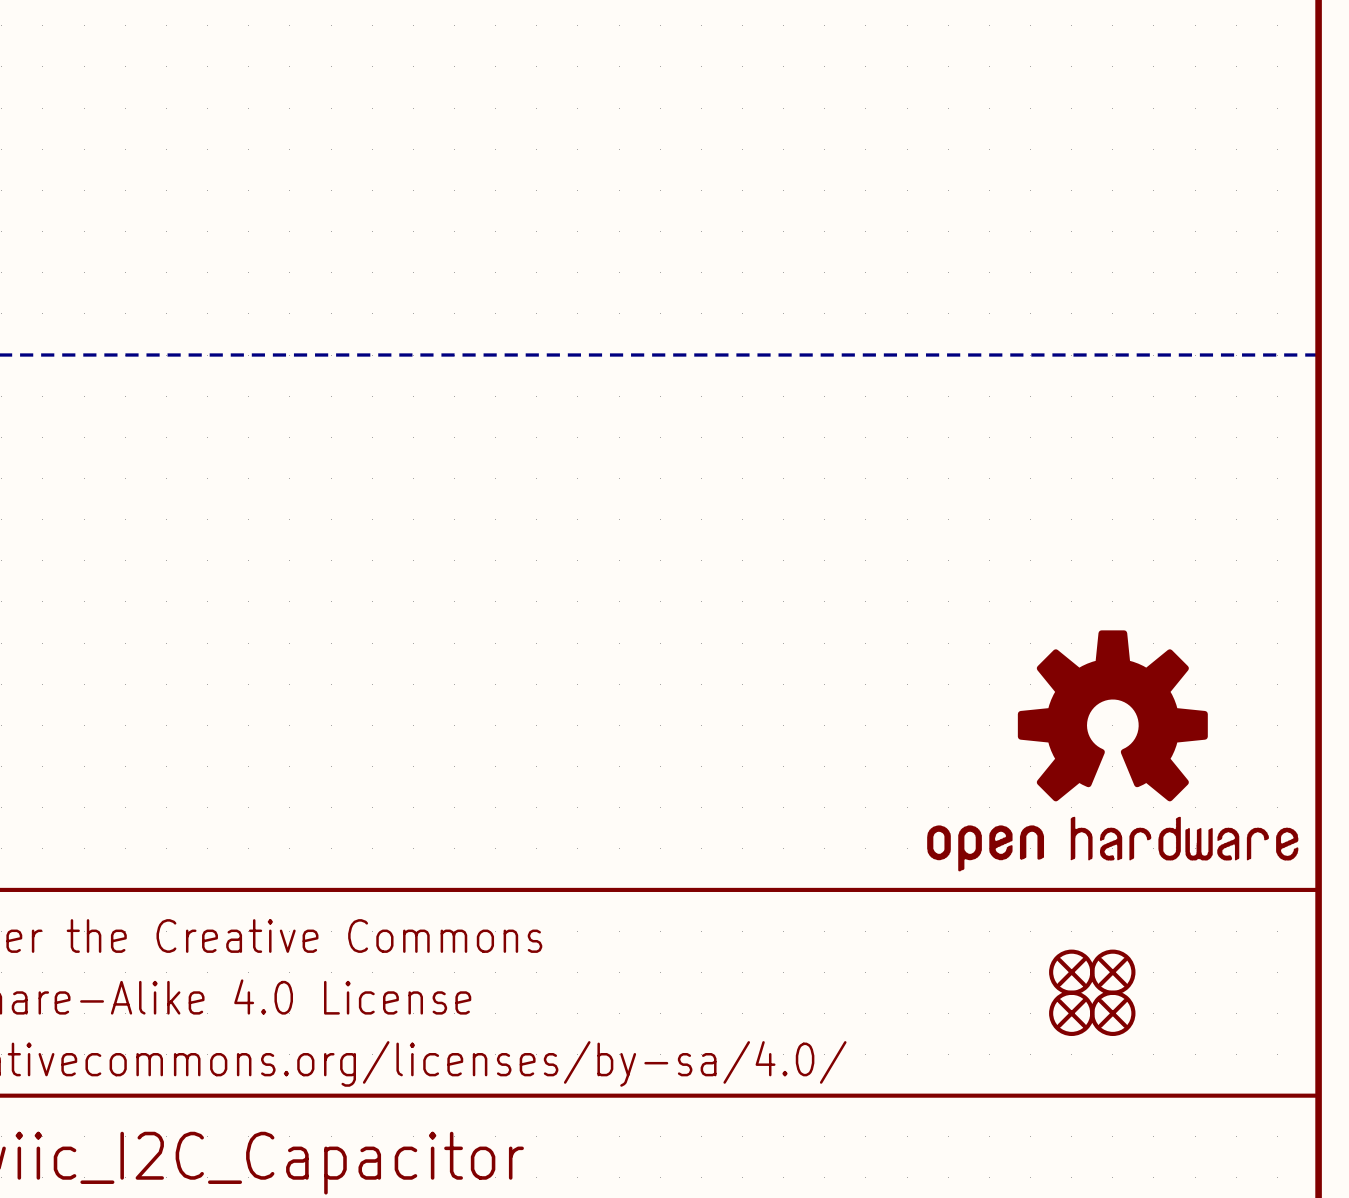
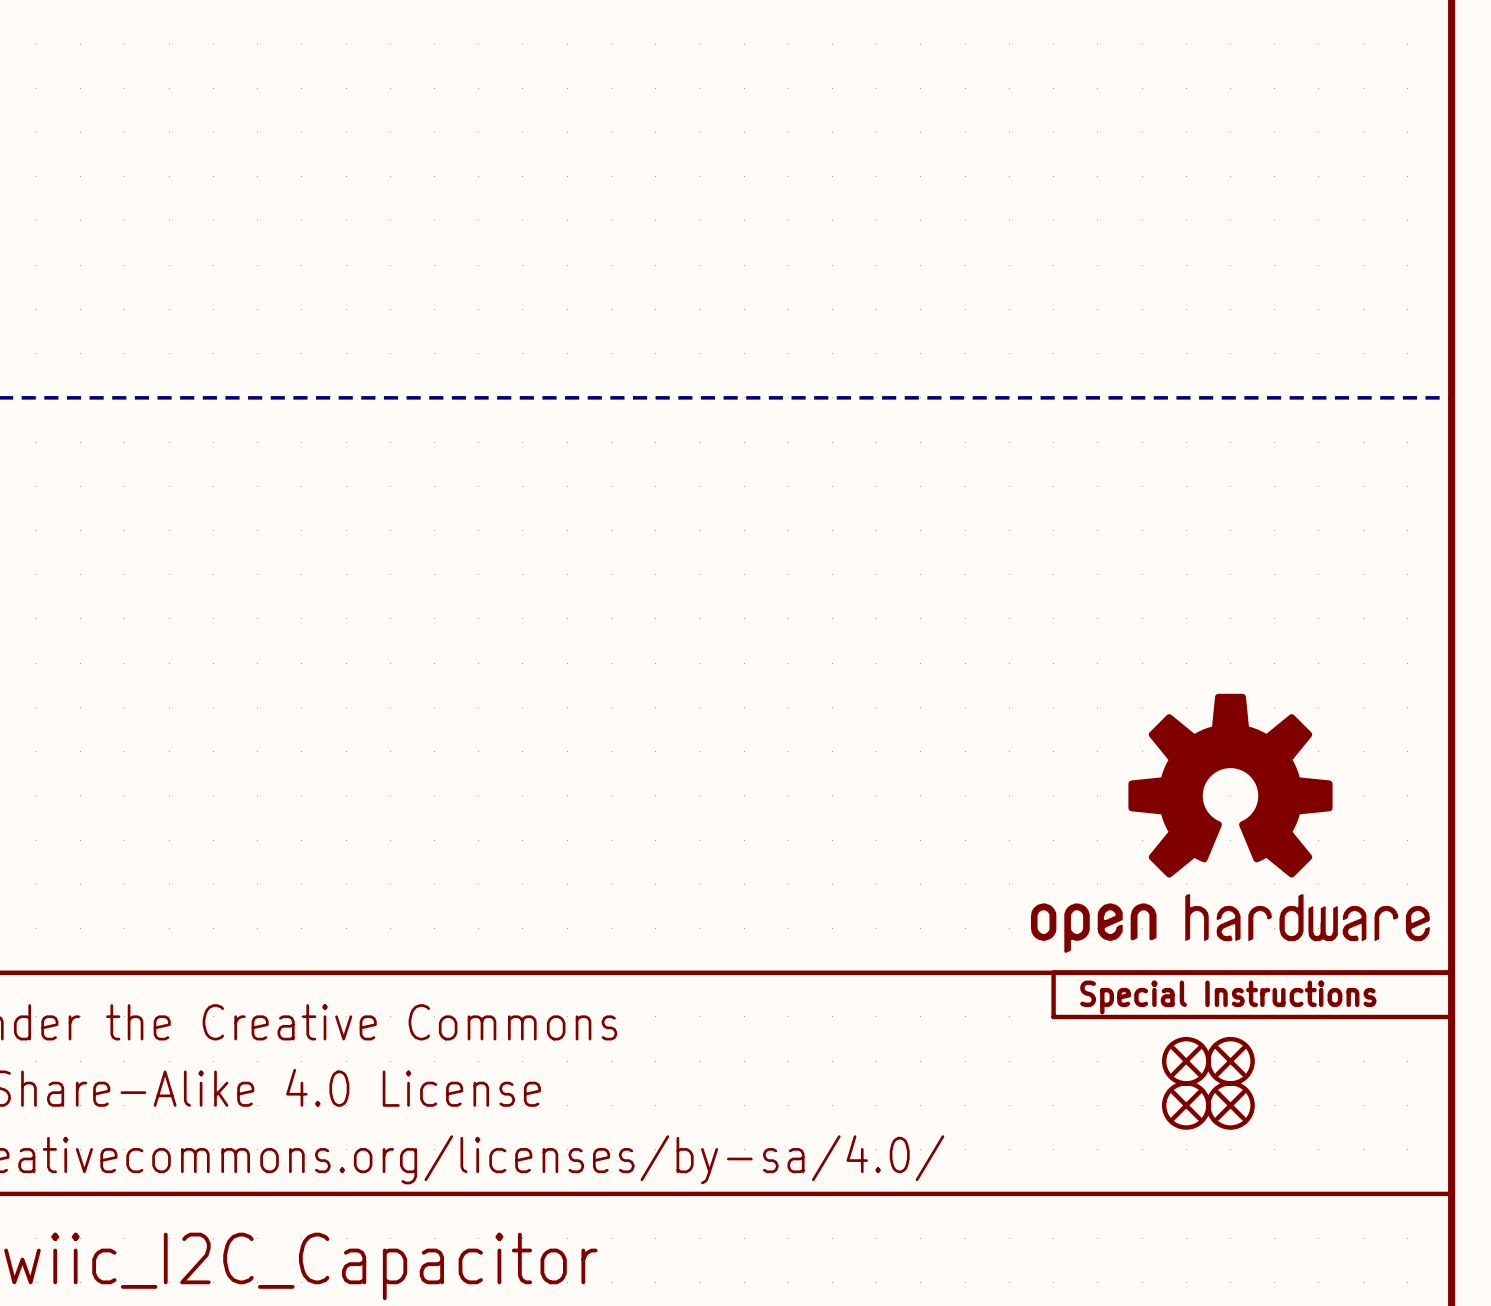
part: none -> (1252, 994)

